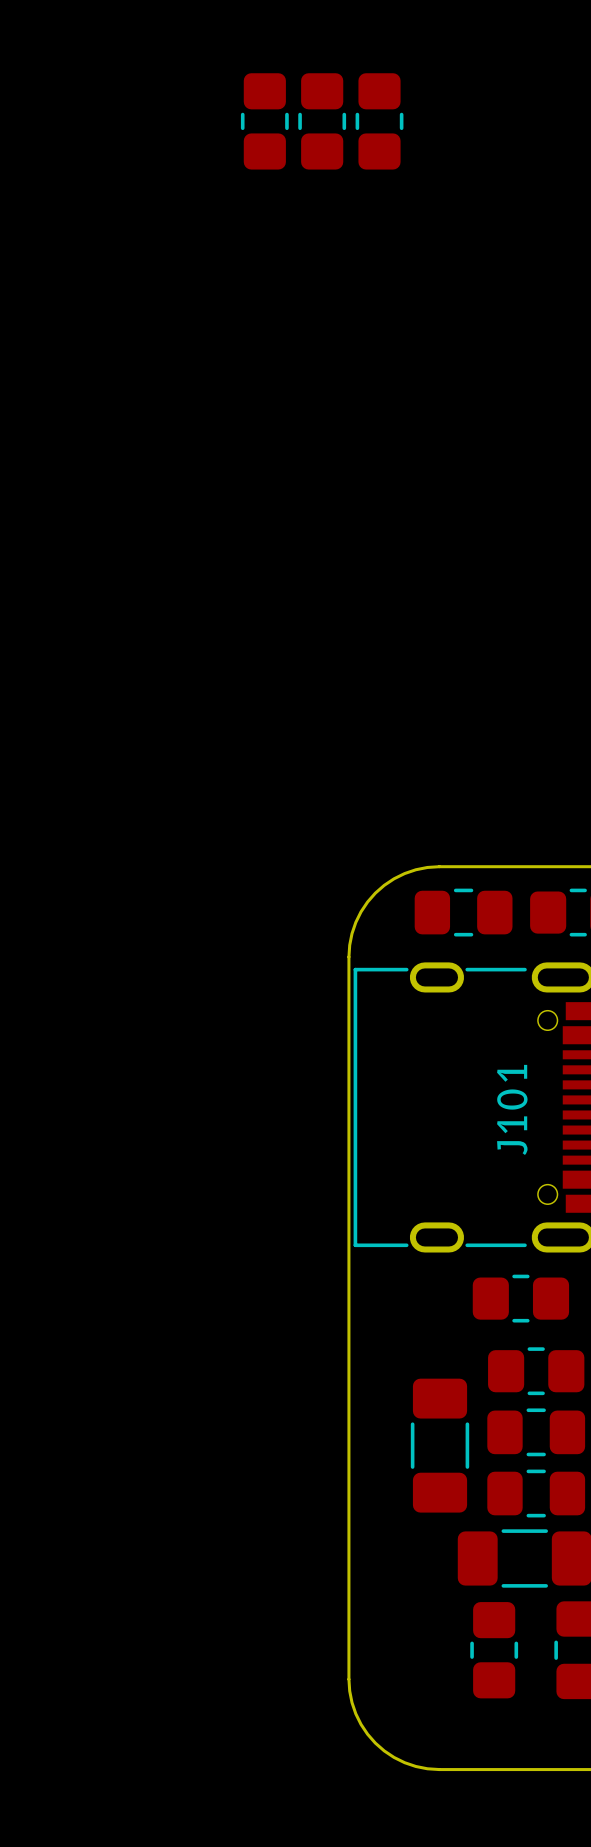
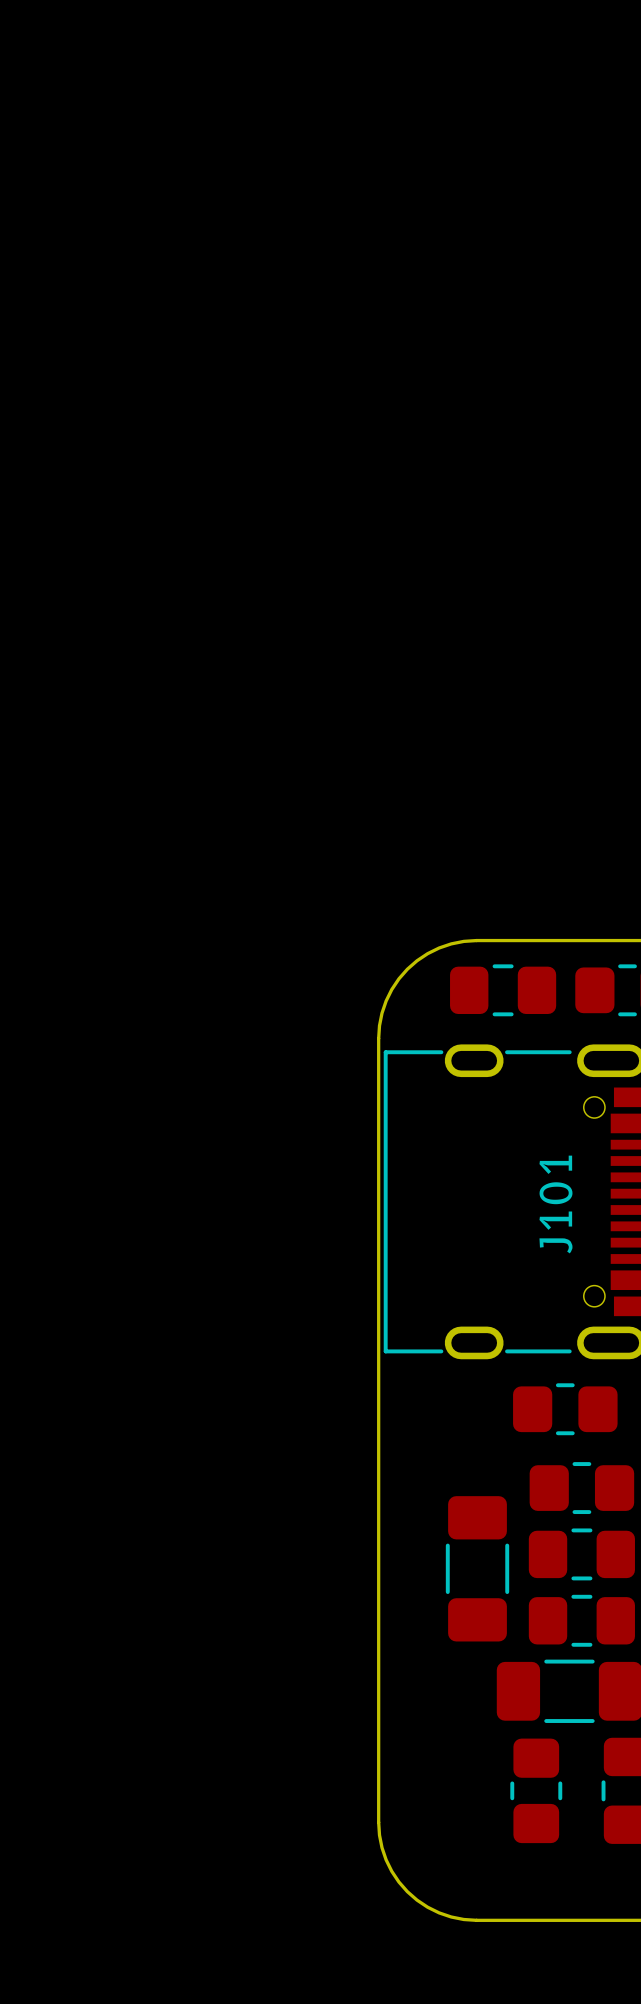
part: (264, 121) -> none
part: (322, 121) -> none
part: (379, 121) -> none

